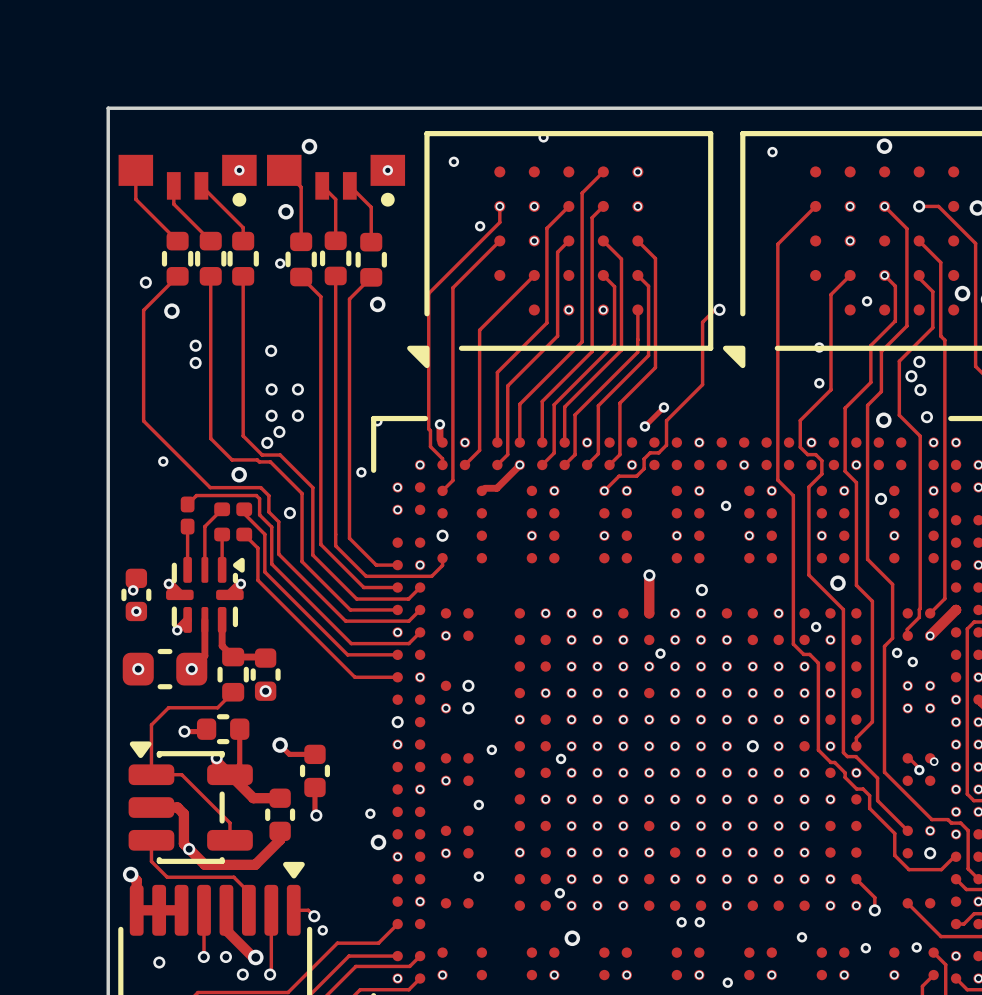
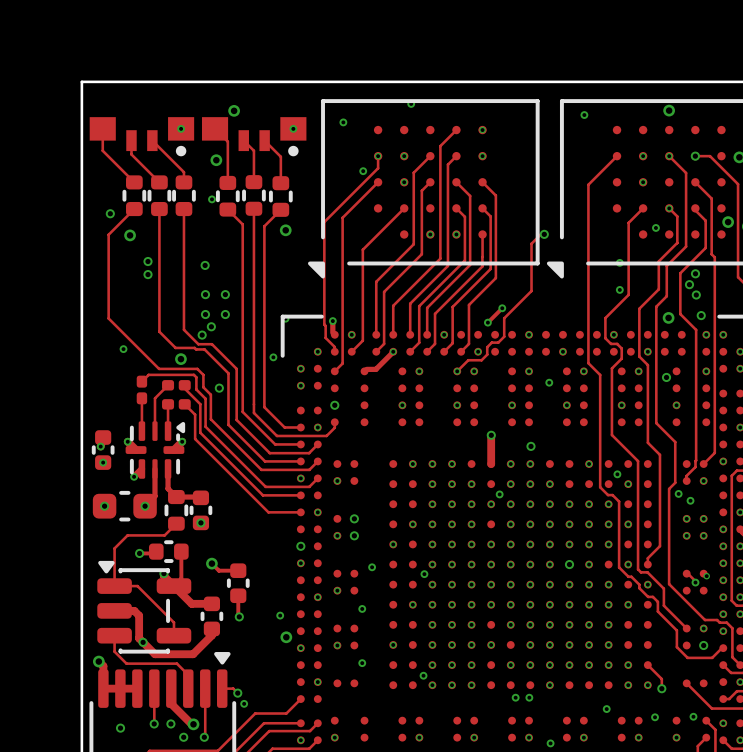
via: (837, 583) -> none
track: (956, 609) (930, 635) -> none
via: none -> (723, 461)
via: (572, 938) -> none

